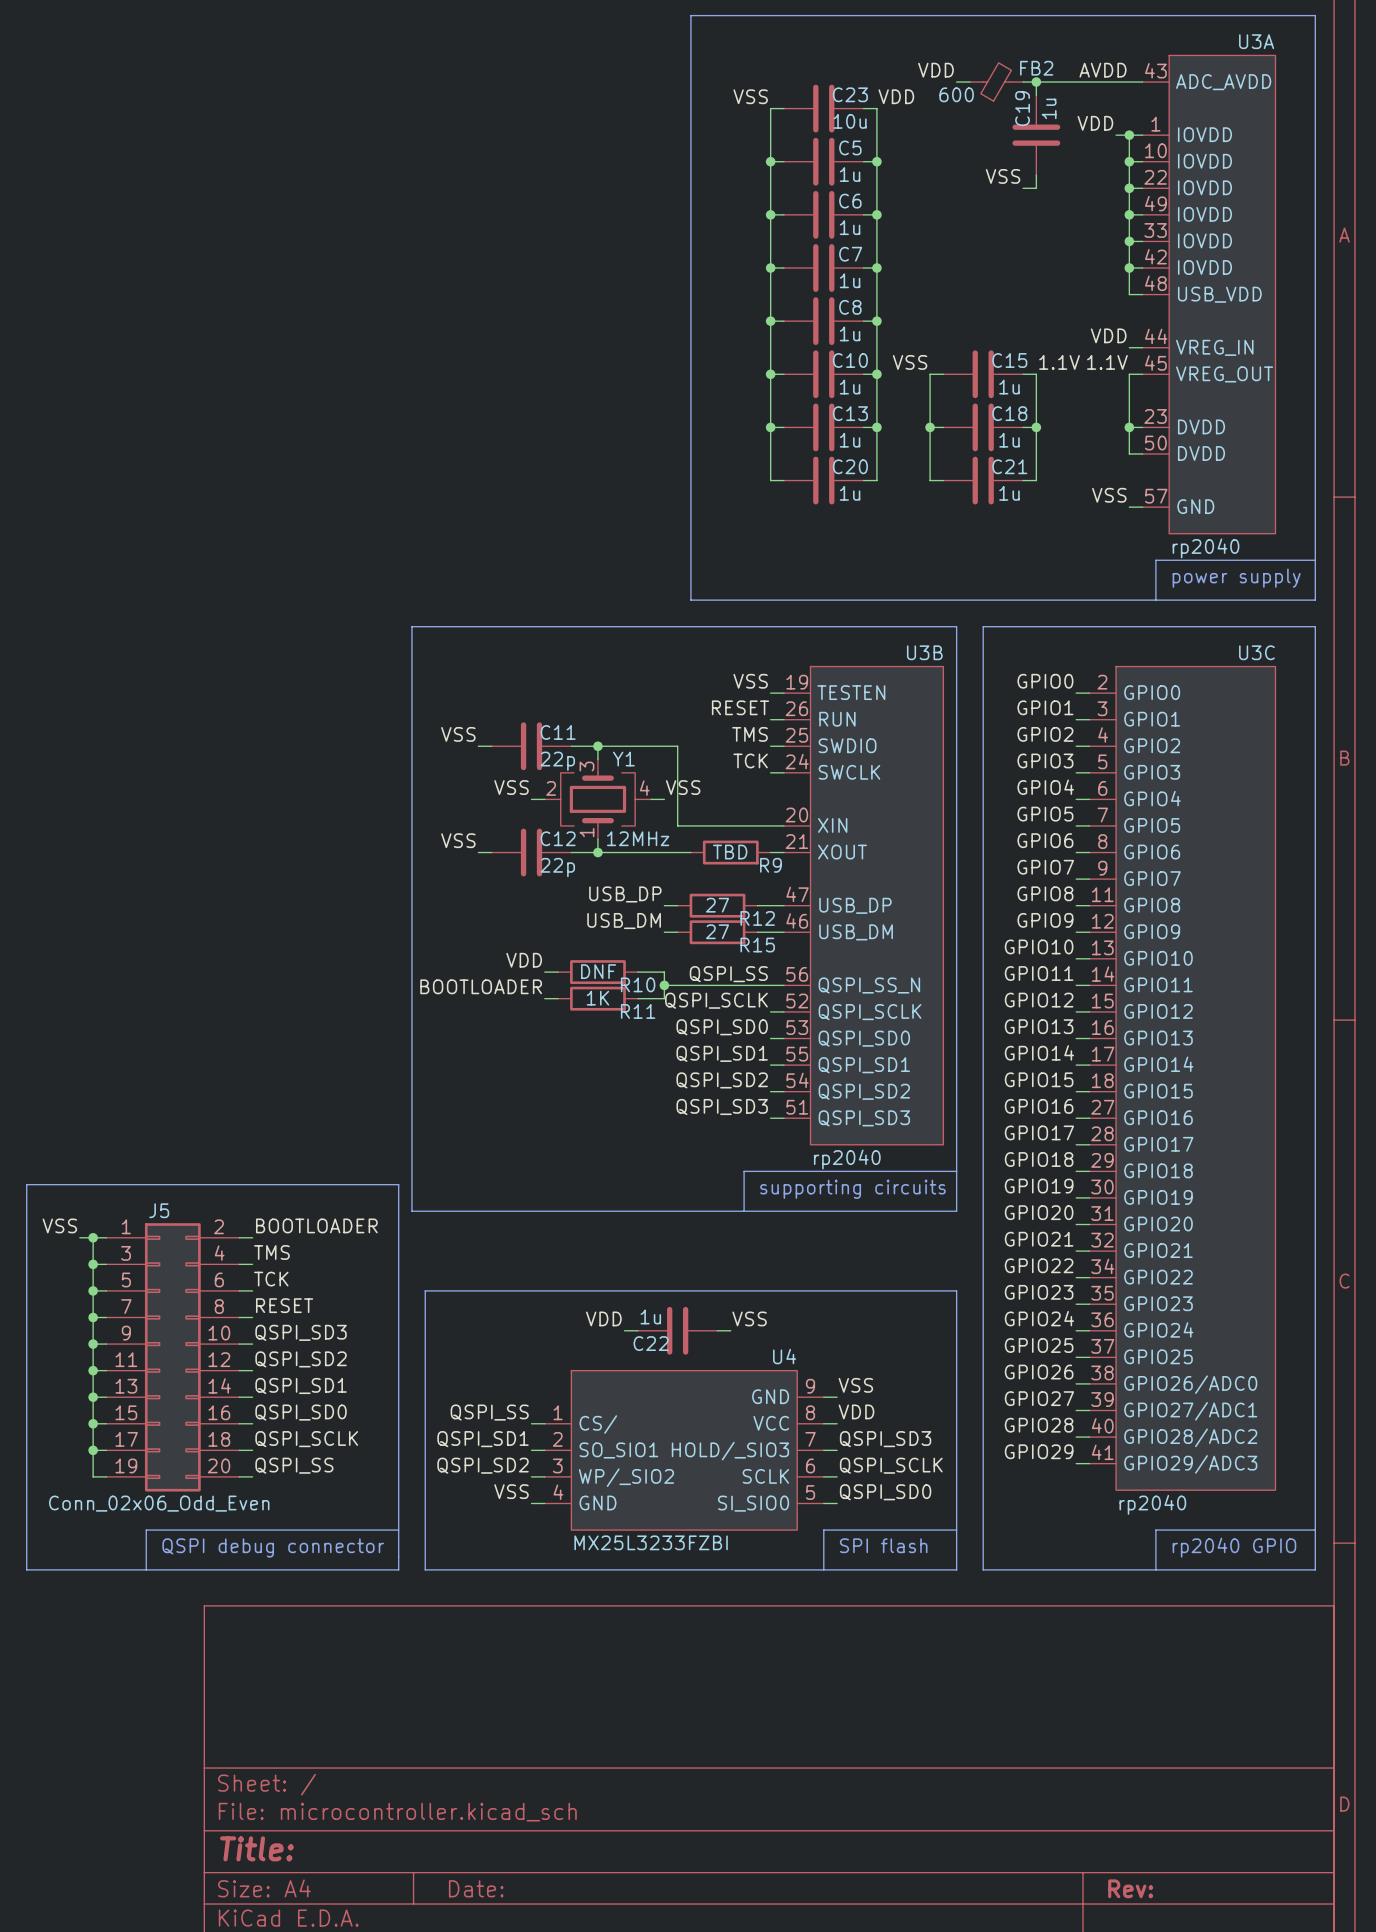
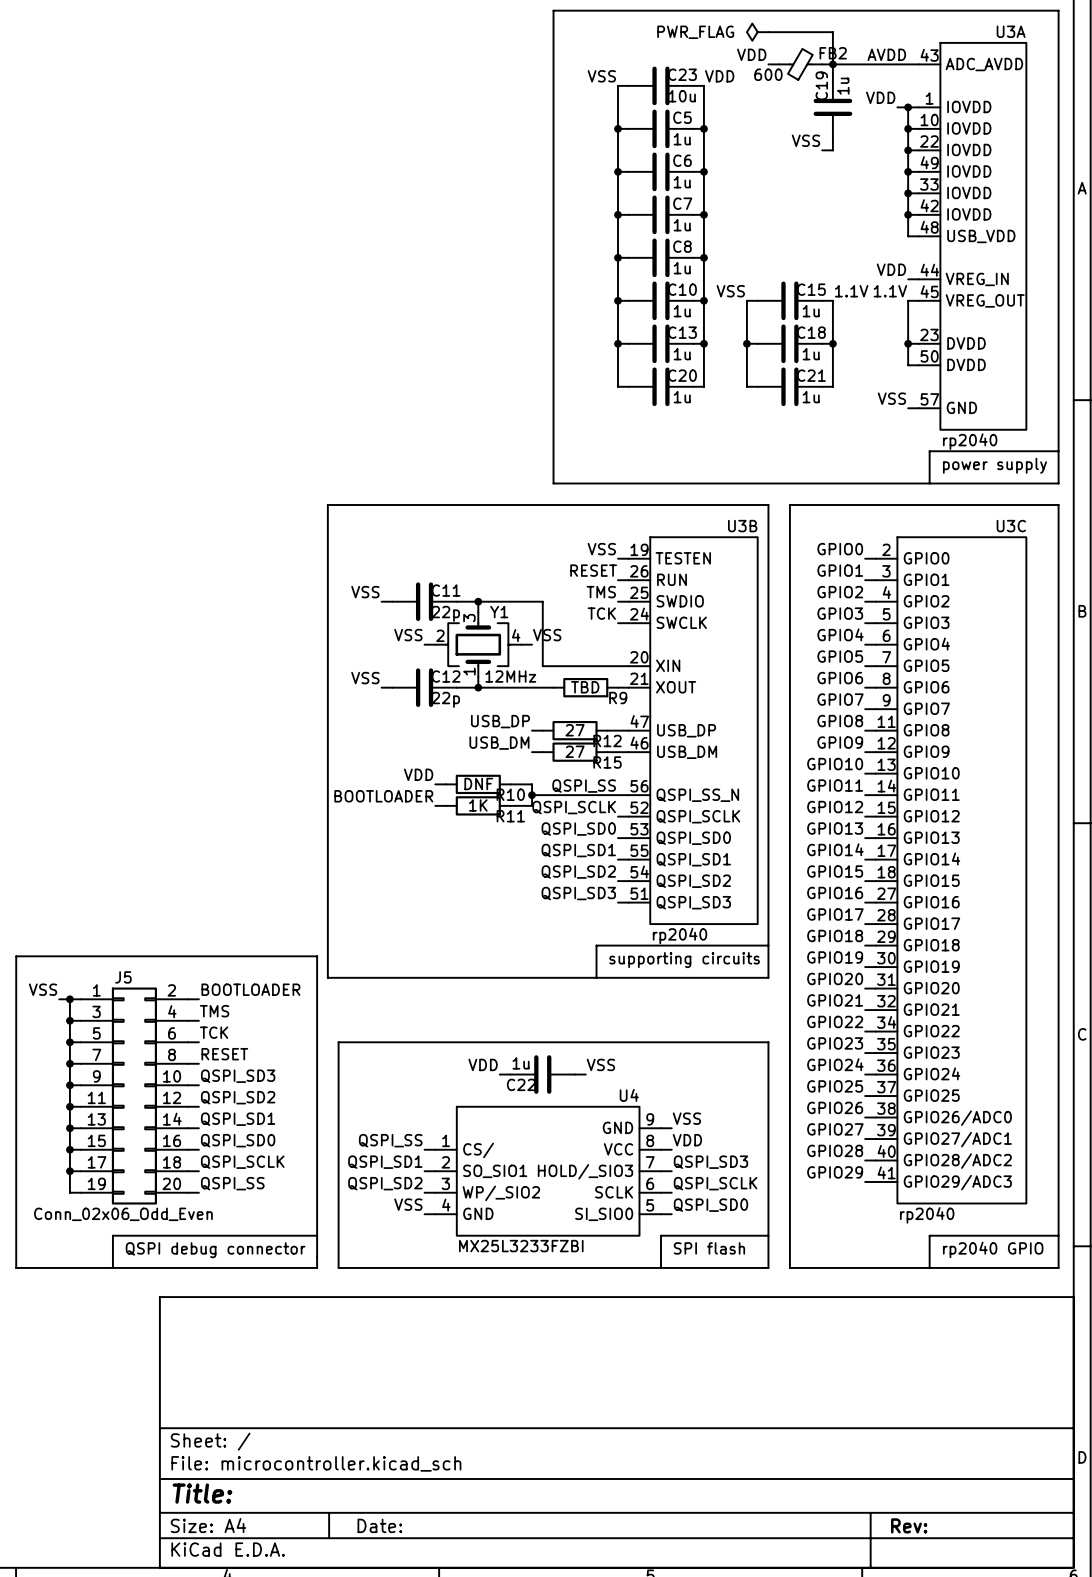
power symbol: none -> PWR_FLAG (757, 32)
wire: none -> (768, 32) (832, 32) (832, 64)

